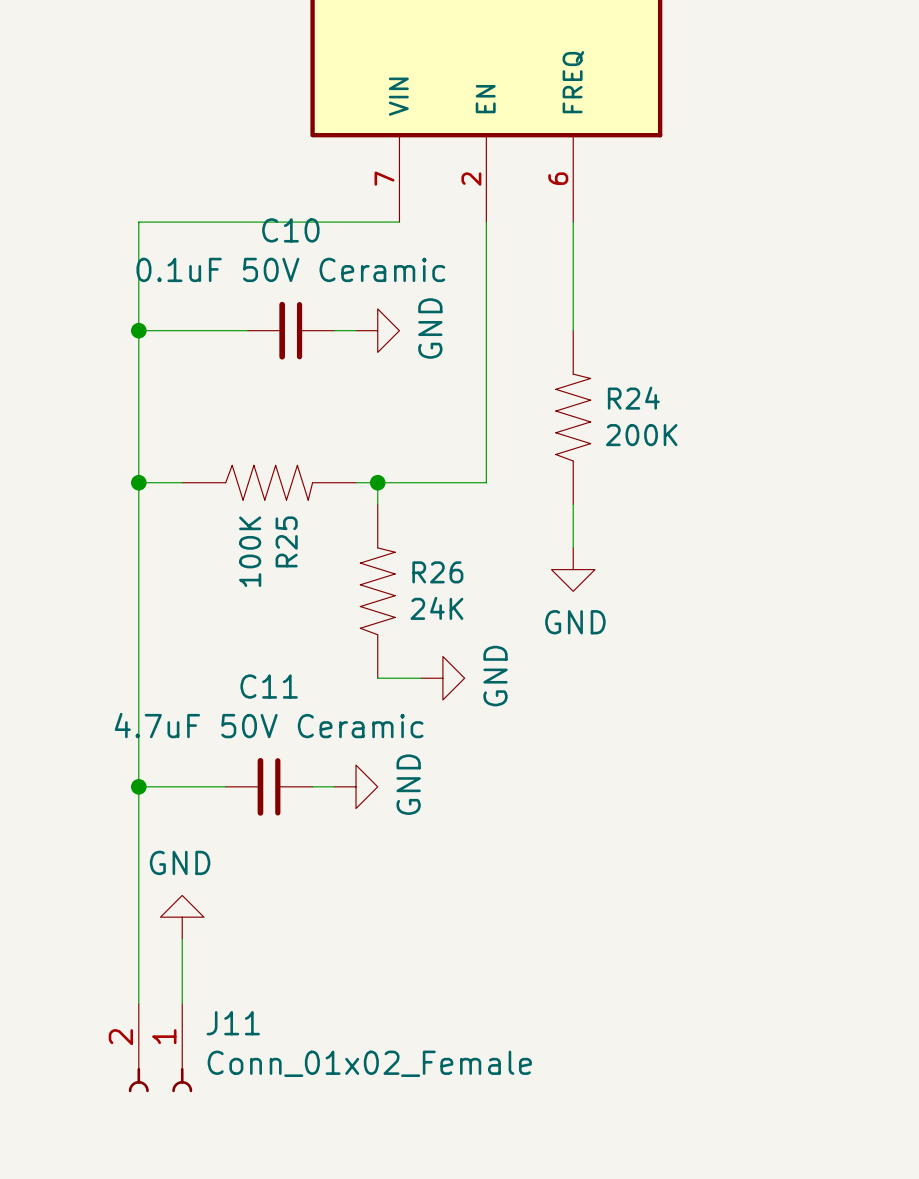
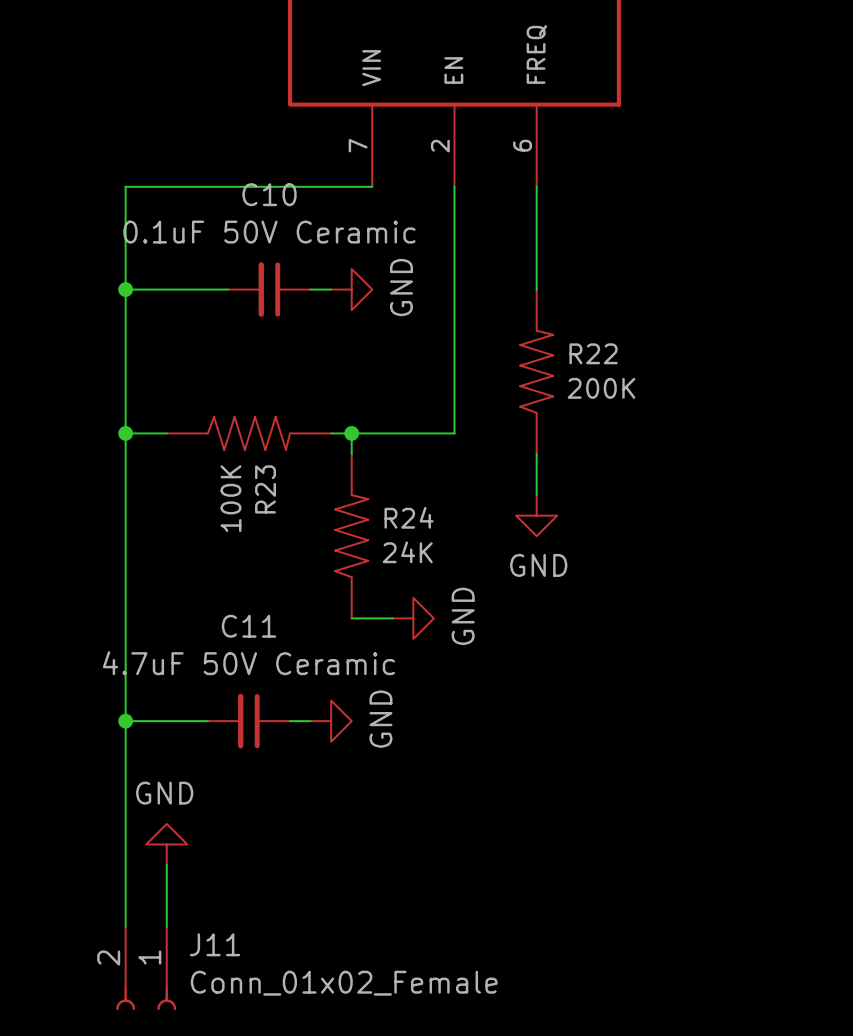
R24 name: R24 (633, 398) -> R22 (593, 353)
R25 name: R25 (286, 541) -> R23 (265, 489)
R26 name: R26 (437, 572) -> R24 (409, 517)

